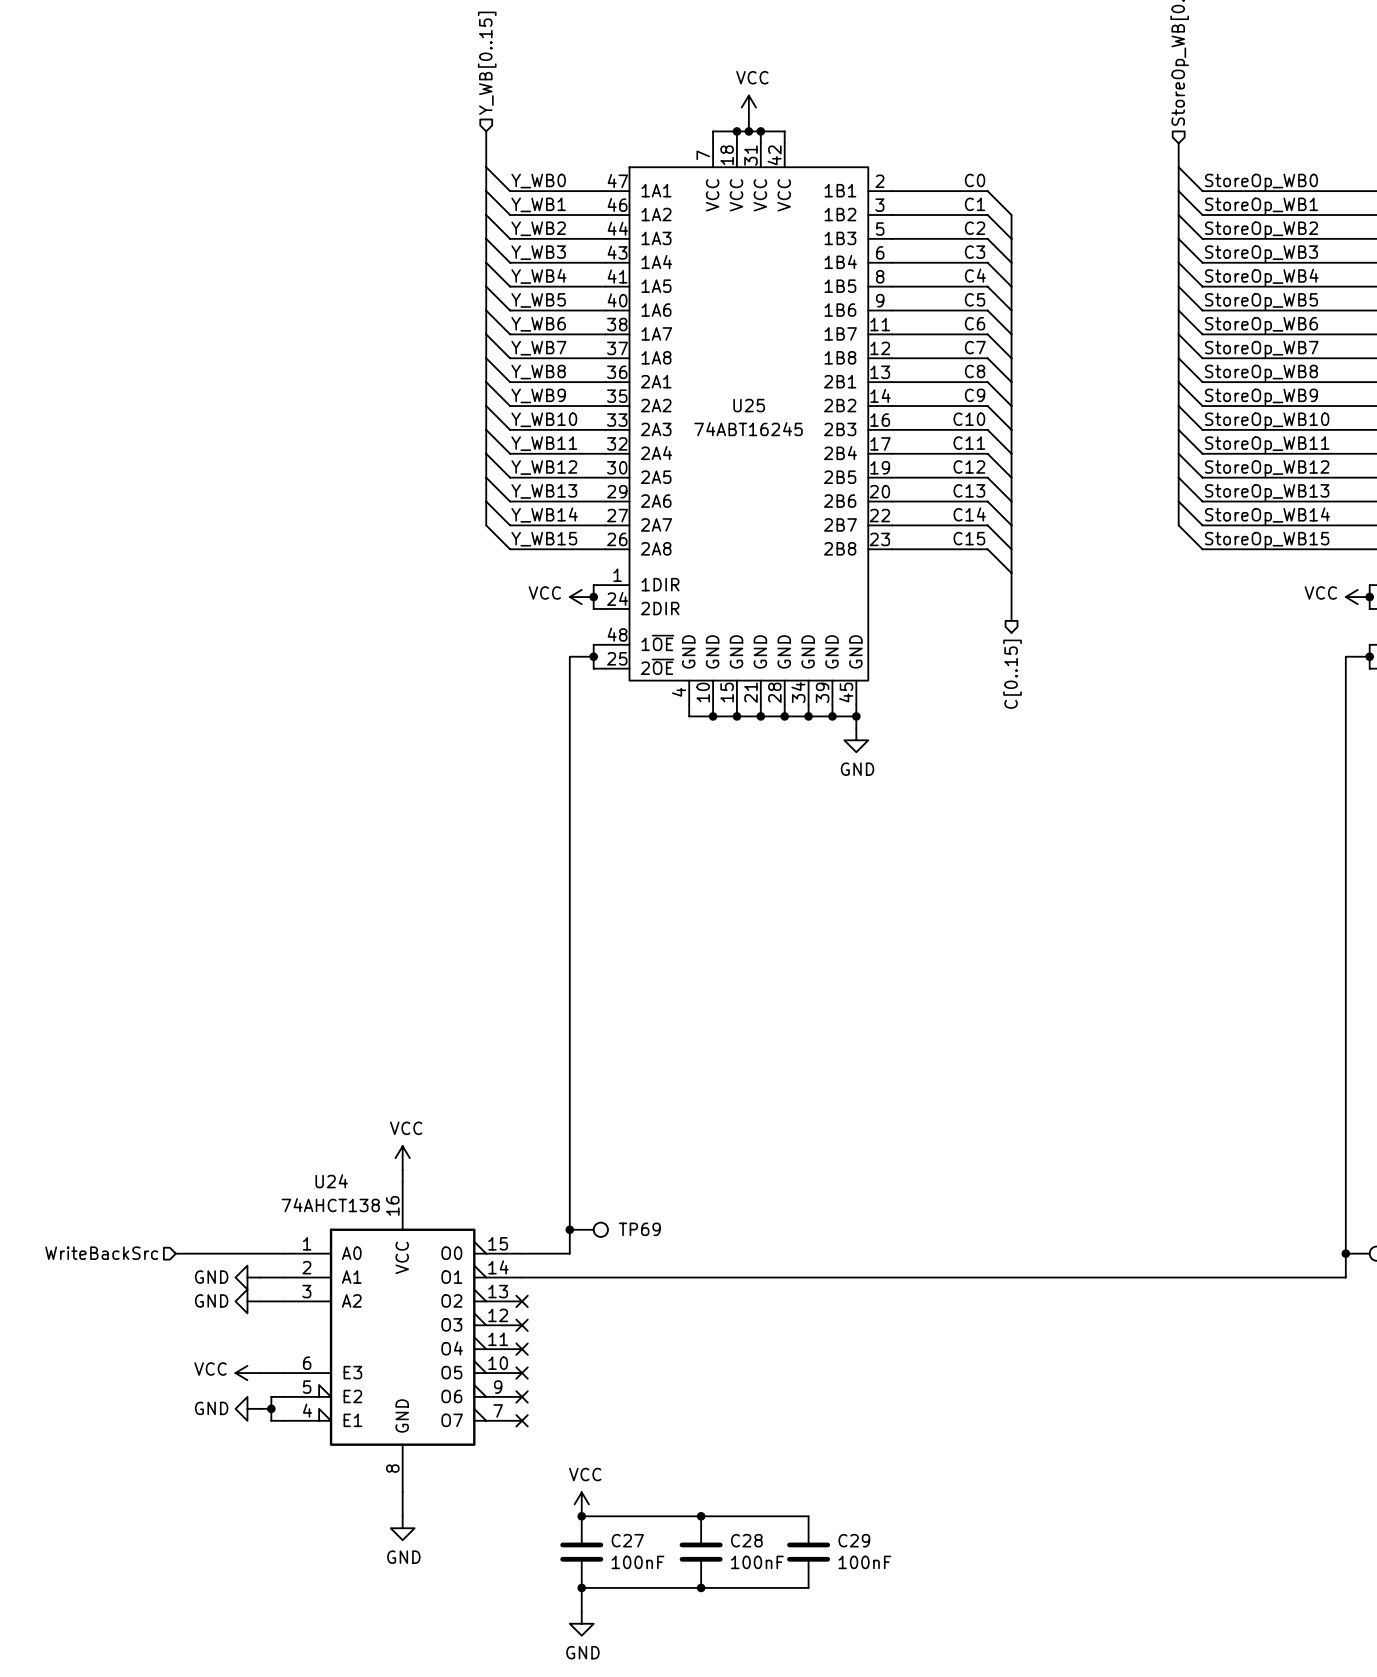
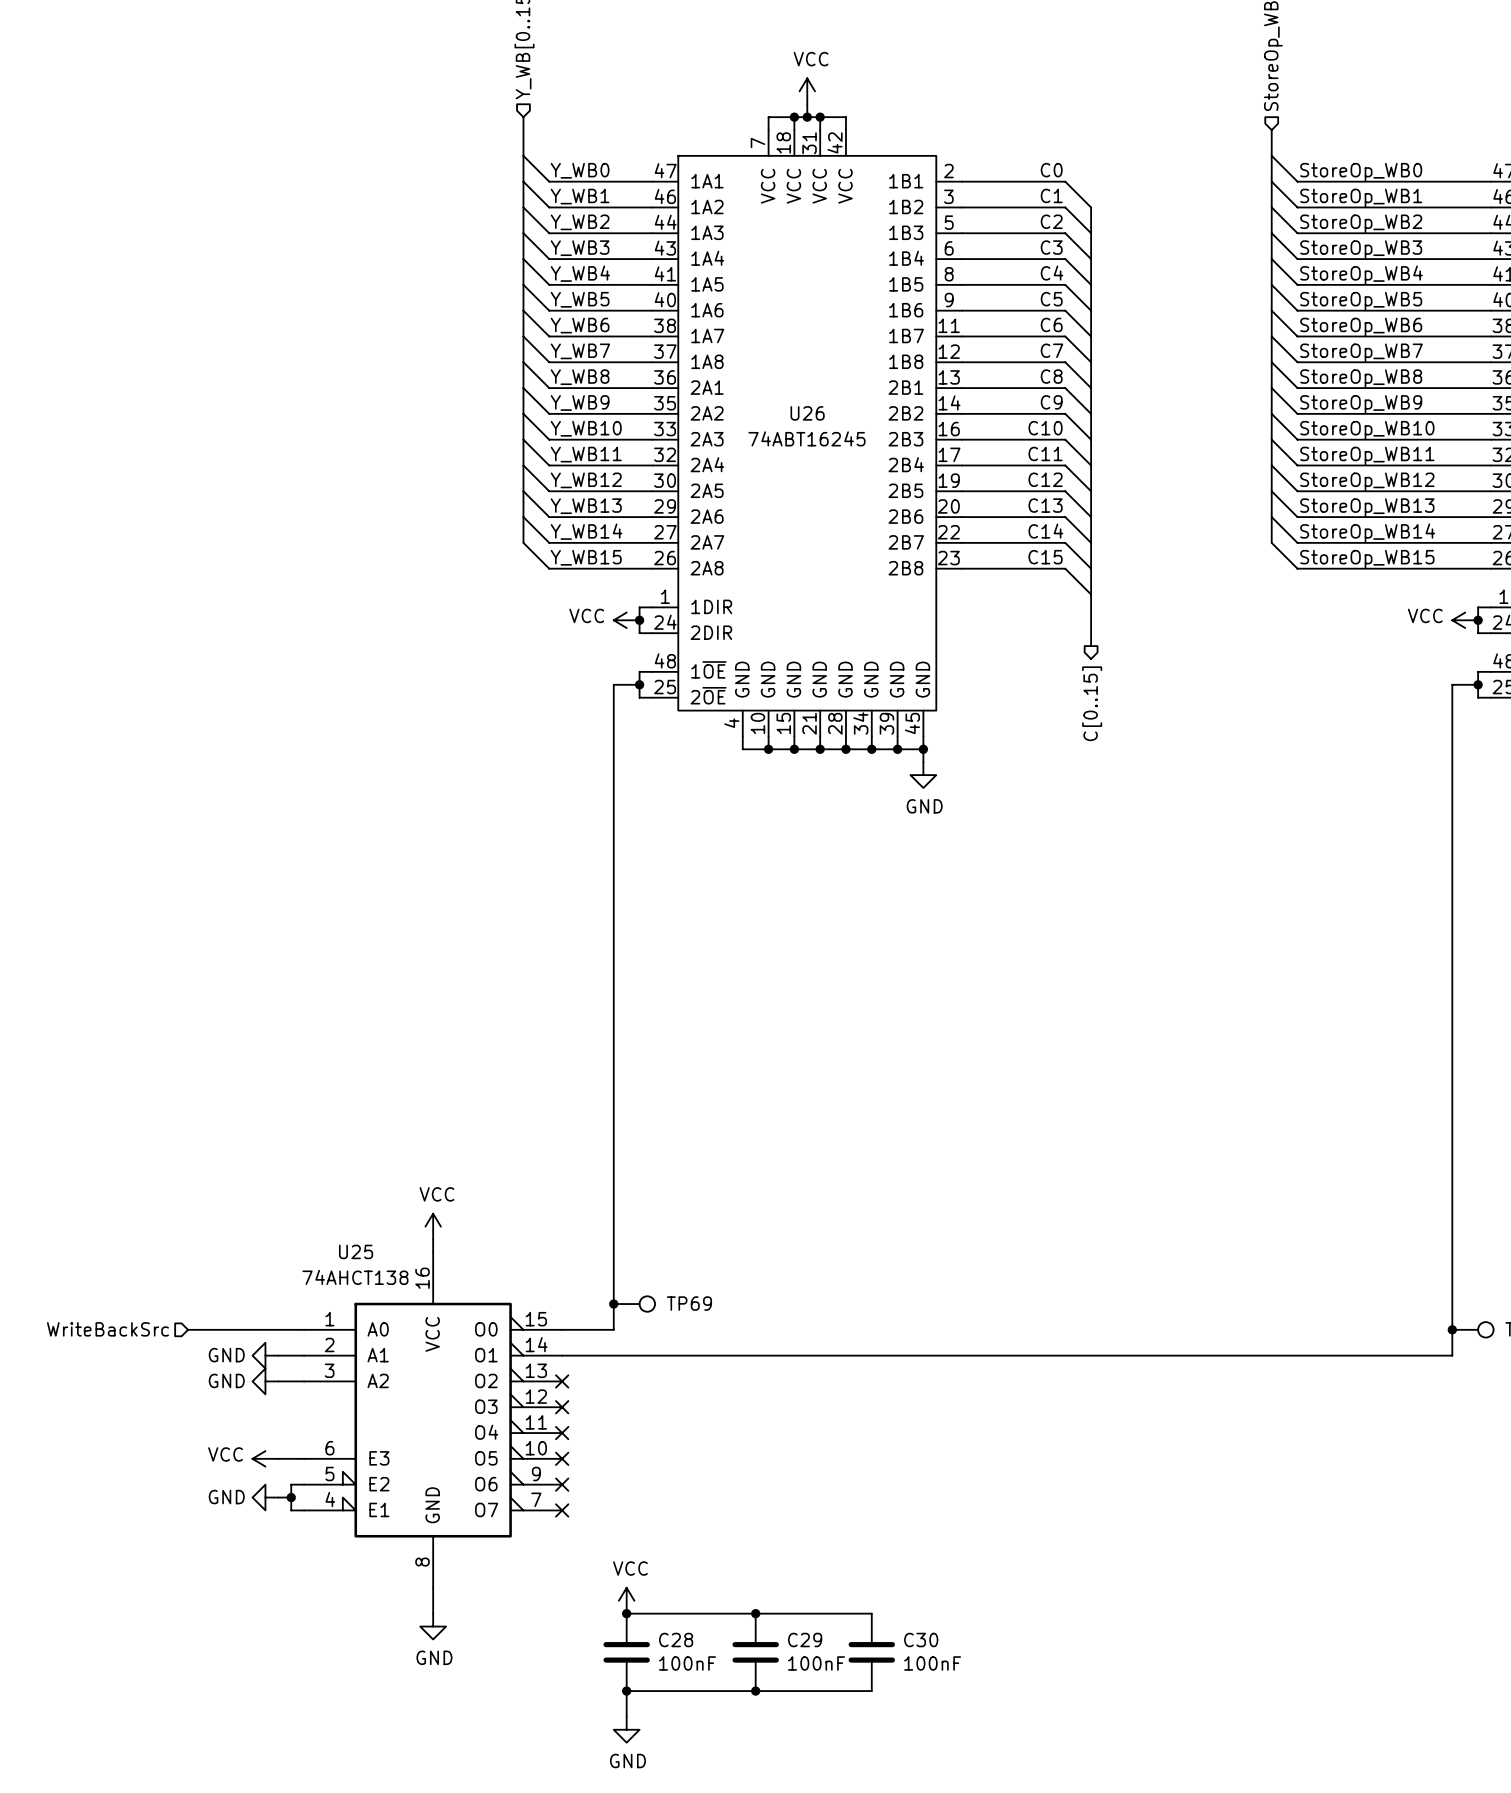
U25 name: U25 (749, 405) -> U26 (807, 413)
U24 name: U24 (331, 1181) -> U25 (356, 1251)
C27 name: C27 (627, 1540) -> C28 (676, 1640)
C28 name: C28 (746, 1540) -> C29 (805, 1640)
C29 name: C29 (854, 1540) -> C30 (921, 1640)

